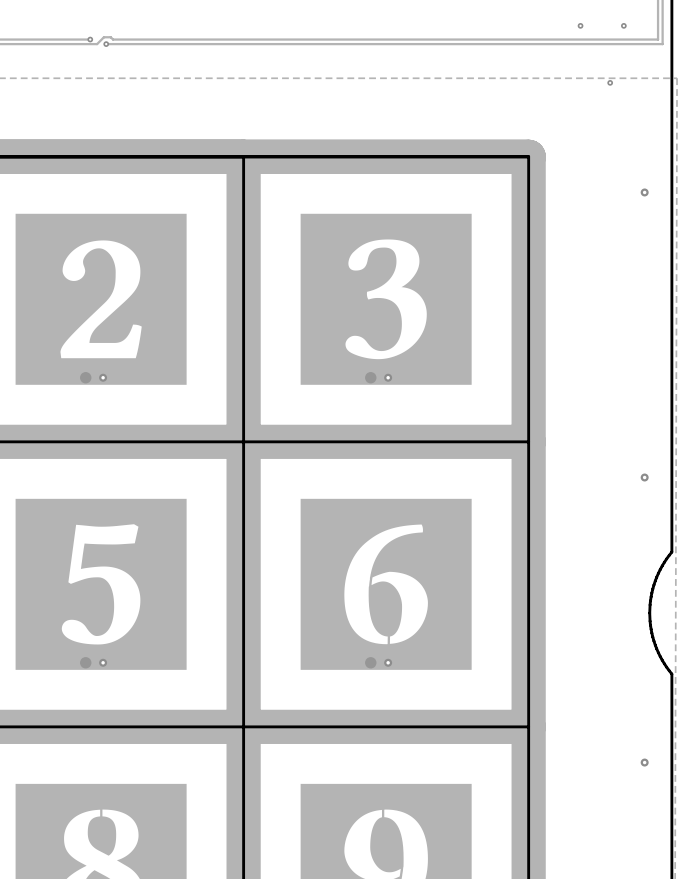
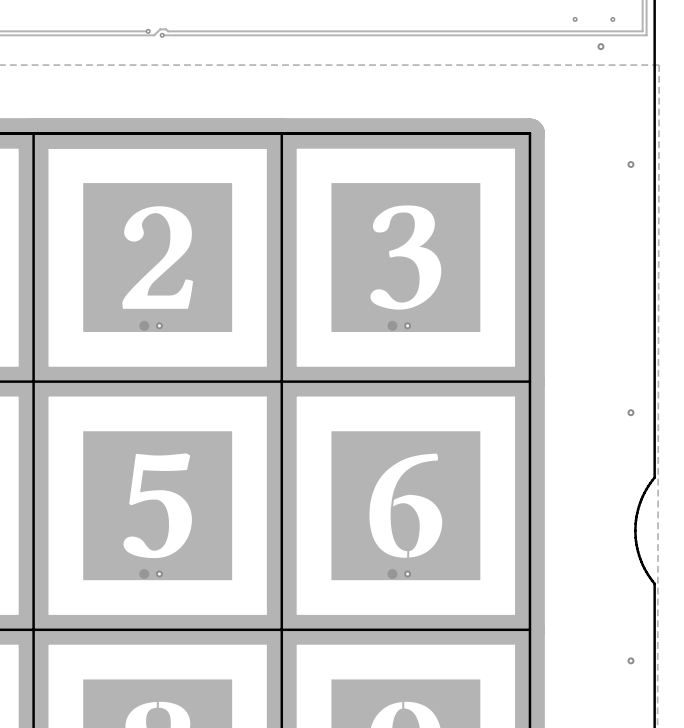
via: none -> (600, 46)
via: (610, 82) -> none

